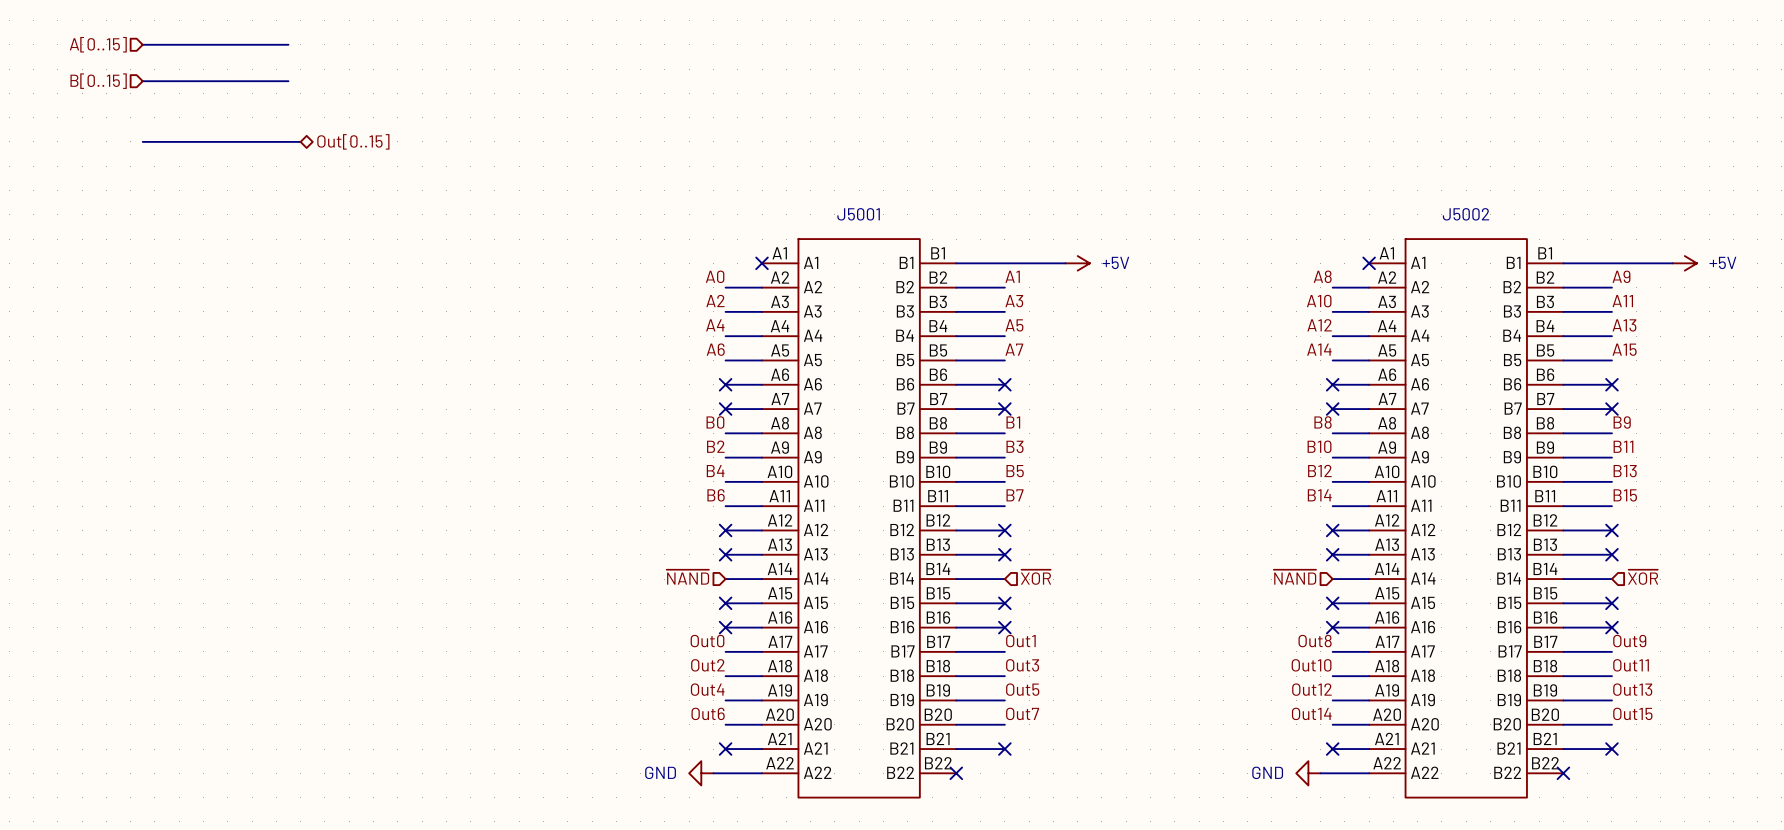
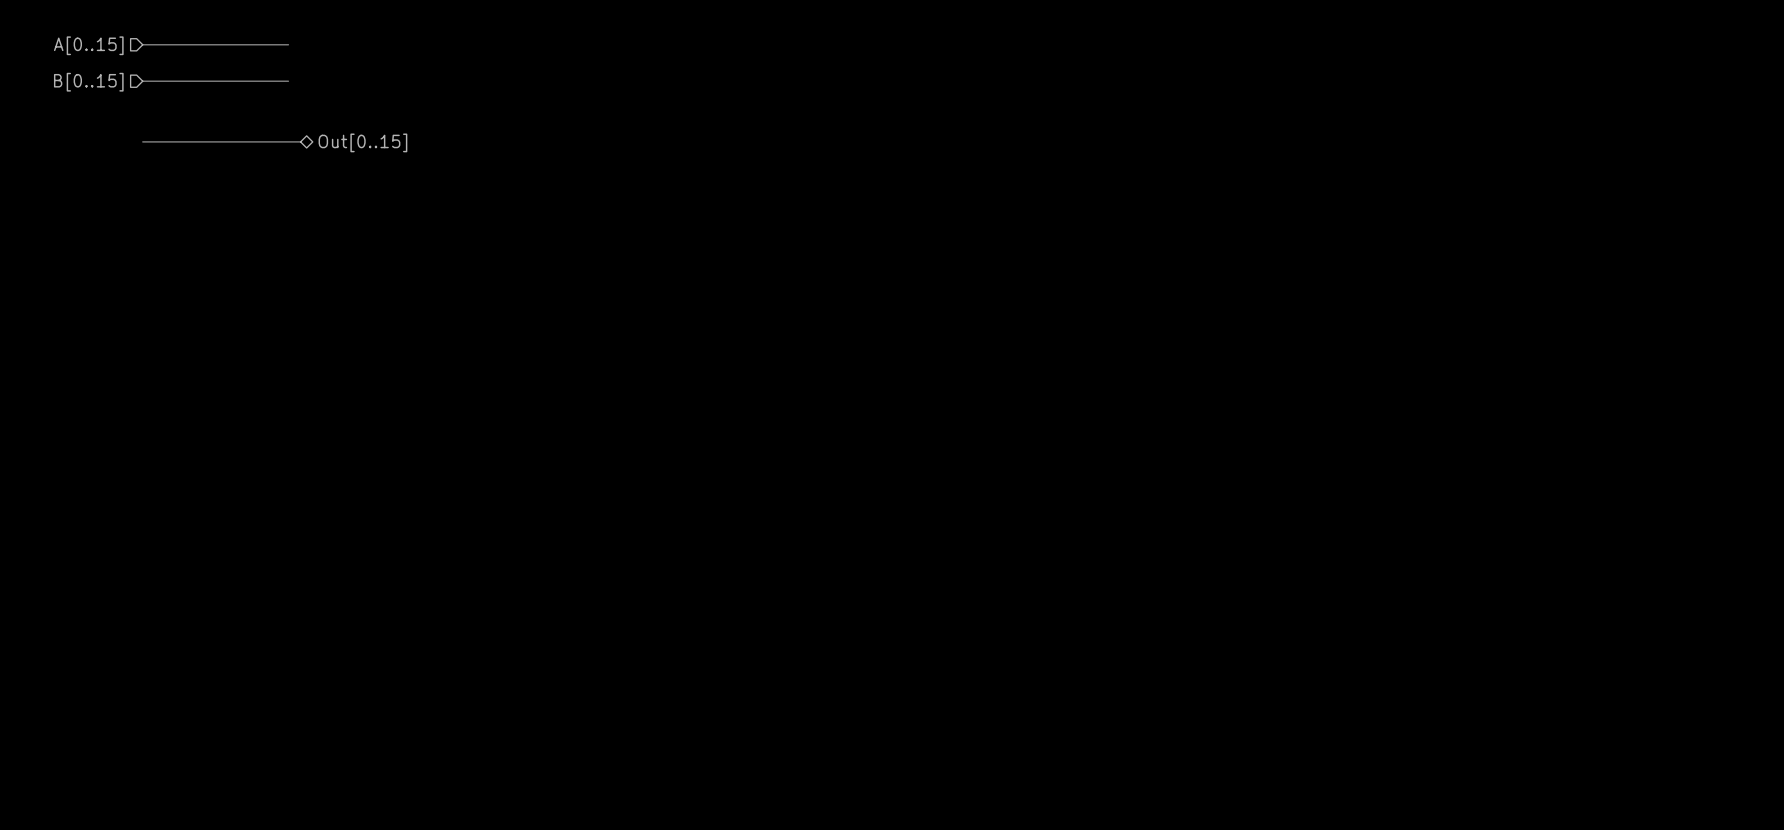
no-connect mark: (762, 263) -> none
wire: (956, 263) (1065, 263) -> none
power symbol: +5V (1077, 263) -> none
no-connect mark: (1369, 263) -> none
wire: (1563, 263) (1672, 263) -> none
power symbol: +5V (1684, 263) -> none
label: A0 (715, 276) -> none
label: A1 (1012, 276) -> none
label: A8 (1322, 276) -> none
label: A9 (1621, 276) -> none
wire: (725, 287) (762, 287) -> none
wire: (956, 287) (1004, 287) -> none
wire: (1332, 287) (1369, 287) -> none
wire: (1563, 287) (1611, 287) -> none
label: A2 (715, 301) -> none
label: A3 (1014, 301) -> none
label: A10 (1319, 301) -> none
label: A11 (1622, 301) -> none
wire: (725, 311) (762, 311) -> none
wire: (956, 311) (1004, 311) -> none
wire: (1332, 311) (1369, 311) -> none
wire: (1563, 311) (1611, 311) -> none
label: A4 (715, 325) -> none
label: A5 (1014, 325) -> none
label: A12 (1319, 325) -> none
label: A13 (1624, 325) -> none
wire: (725, 336) (762, 336) -> none
wire: (956, 336) (1004, 336) -> none
wire: (1332, 336) (1369, 336) -> none
wire: (1563, 336) (1611, 336) -> none
label: A6 (715, 349) -> none
label: A7 (1014, 349) -> none
label: A14 (1319, 349) -> none
label: A15 (1624, 349) -> none
wire: (725, 360) (762, 360) -> none
wire: (956, 360) (1004, 360) -> none
wire: (1332, 360) (1369, 360) -> none
wire: (1563, 360) (1611, 360) -> none
wire: (725, 384) (762, 384) -> none
no-connect mark: (725, 384) -> none
wire: (956, 384) (1004, 384) -> none
no-connect mark: (1004, 384) -> none
wire: (1332, 384) (1369, 384) -> none
no-connect mark: (1332, 384) -> none
wire: (1563, 384) (1611, 384) -> none
no-connect mark: (1611, 384) -> none
wire: (725, 409) (762, 409) -> none
no-connect mark: (725, 409) -> none
wire: (956, 409) (1004, 409) -> none
no-connect mark: (1004, 409) -> none
wire: (1332, 409) (1369, 409) -> none
no-connect mark: (1332, 409) -> none
wire: (1563, 409) (1611, 409) -> none
no-connect mark: (1611, 409) -> none
label: B0 (715, 422) -> none
label: B1 (1013, 422) -> none
label: B8 (1323, 422) -> none
label: B9 (1622, 422) -> none
wire: (725, 433) (762, 433) -> none
wire: (956, 433) (1004, 433) -> none
wire: (1332, 433) (1369, 433) -> none
wire: (1563, 433) (1611, 433) -> none
label: B2 (715, 446) -> none
label: B3 (1015, 446) -> none
label: B10 (1319, 446) -> none
label: B11 (1623, 446) -> none
wire: (725, 457) (762, 457) -> none
wire: (956, 457) (1004, 457) -> none
wire: (1332, 457) (1369, 457) -> none
wire: (1563, 457) (1611, 457) -> none
label: B12 (1319, 470) -> none
label: B4 (715, 471) -> none
label: B5 (1015, 471) -> none
label: B13 (1625, 471) -> none
wire: (725, 481) (762, 481) -> none
wire: (956, 481) (1004, 481) -> none
wire: (1332, 481) (1369, 481) -> none
wire: (1563, 481) (1611, 481) -> none
label: B6 (716, 495) -> none
label: B7 (1015, 495) -> none
label: B14 (1319, 495) -> none
label: B15 (1625, 495) -> none
wire: (725, 506) (762, 506) -> none
wire: (956, 506) (1004, 506) -> none
wire: (1332, 506) (1369, 506) -> none
wire: (1563, 506) (1611, 506) -> none
J5001: (859, 518) -> none
J5002: (1466, 518) -> none
wire: (725, 530) (762, 530) -> none
no-connect mark: (725, 530) -> none
wire: (956, 530) (1004, 530) -> none
no-connect mark: (1004, 530) -> none
wire: (1332, 530) (1369, 530) -> none
no-connect mark: (1332, 530) -> none
wire: (1563, 530) (1611, 530) -> none
no-connect mark: (1611, 530) -> none
wire: (725, 554) (762, 554) -> none
no-connect mark: (725, 554) -> none
wire: (956, 554) (1004, 554) -> none
no-connect mark: (1004, 554) -> none
wire: (1332, 554) (1369, 554) -> none
no-connect mark: (1332, 554) -> none
wire: (1563, 554) (1611, 554) -> none
no-connect mark: (1611, 554) -> none
hierarchical label: ~{NAND} (687, 577) -> none
hierarchical label: ~{XOR} (1035, 577) -> none
hierarchical label: ~{NAND} (1294, 577) -> none
hierarchical label: ~{XOR} (1643, 577) -> none
wire: (725, 579) (762, 579) -> none
wire: (956, 579) (1004, 579) -> none
wire: (1332, 579) (1369, 579) -> none
wire: (1563, 579) (1611, 579) -> none
wire: (725, 603) (762, 603) -> none
no-connect mark: (725, 603) -> none
wire: (956, 603) (1004, 603) -> none
no-connect mark: (1004, 603) -> none
wire: (1332, 603) (1369, 603) -> none
no-connect mark: (1332, 603) -> none
wire: (1563, 603) (1611, 603) -> none
no-connect mark: (1611, 603) -> none
wire: (725, 627) (762, 627) -> none
no-connect mark: (725, 627) -> none
wire: (956, 627) (1004, 627) -> none
no-connect mark: (1004, 627) -> none
wire: (1332, 627) (1369, 627) -> none
no-connect mark: (1332, 627) -> none
wire: (1563, 627) (1611, 627) -> none
no-connect mark: (1611, 627) -> none
label: Out0 (707, 641) -> none
label: Out1 (1020, 641) -> none
label: Out8 (1315, 641) -> none
label: Out9 (1629, 641) -> none
wire: (725, 651) (762, 651) -> none
wire: (956, 651) (1004, 651) -> none
wire: (1332, 651) (1369, 651) -> none
wire: (1563, 651) (1611, 651) -> none
label: Out2 (707, 665) -> none
label: Out3 (1022, 665) -> none
label: Out10 (1311, 665) -> none
label: Out11 (1631, 665) -> none
wire: (725, 676) (762, 676) -> none
wire: (956, 676) (1004, 676) -> none
wire: (1332, 676) (1369, 676) -> none
wire: (1563, 676) (1611, 676) -> none
label: Out4 (707, 689) -> none
label: Out5 (1022, 689) -> none
label: Out12 (1311, 689) -> none
label: Out13 (1632, 689) -> none
wire: (725, 700) (762, 700) -> none
wire: (956, 700) (1004, 700) -> none
wire: (1332, 700) (1369, 700) -> none
wire: (1563, 700) (1611, 700) -> none
label: Out6 (708, 713) -> none
label: Out7 (1022, 713) -> none
label: Out14 (1311, 713) -> none
label: Out15 (1632, 713) -> none
wire: (725, 724) (762, 724) -> none
wire: (956, 724) (1004, 724) -> none
wire: (1332, 724) (1369, 724) -> none
wire: (1563, 724) (1611, 724) -> none
wire: (725, 749) (762, 749) -> none
no-connect mark: (725, 749) -> none
wire: (956, 749) (1004, 749) -> none
no-connect mark: (1004, 749) -> none
wire: (1332, 749) (1369, 749) -> none
no-connect mark: (1332, 749) -> none
wire: (1563, 749) (1611, 749) -> none
no-connect mark: (1611, 749) -> none
power symbol: GND (701, 773) -> none
wire: (713, 773) (762, 773) -> none
no-connect mark: (956, 773) -> none
power symbol: GND (1308, 773) -> none
wire: (1320, 773) (1369, 773) -> none
no-connect mark: (1563, 773) -> none

